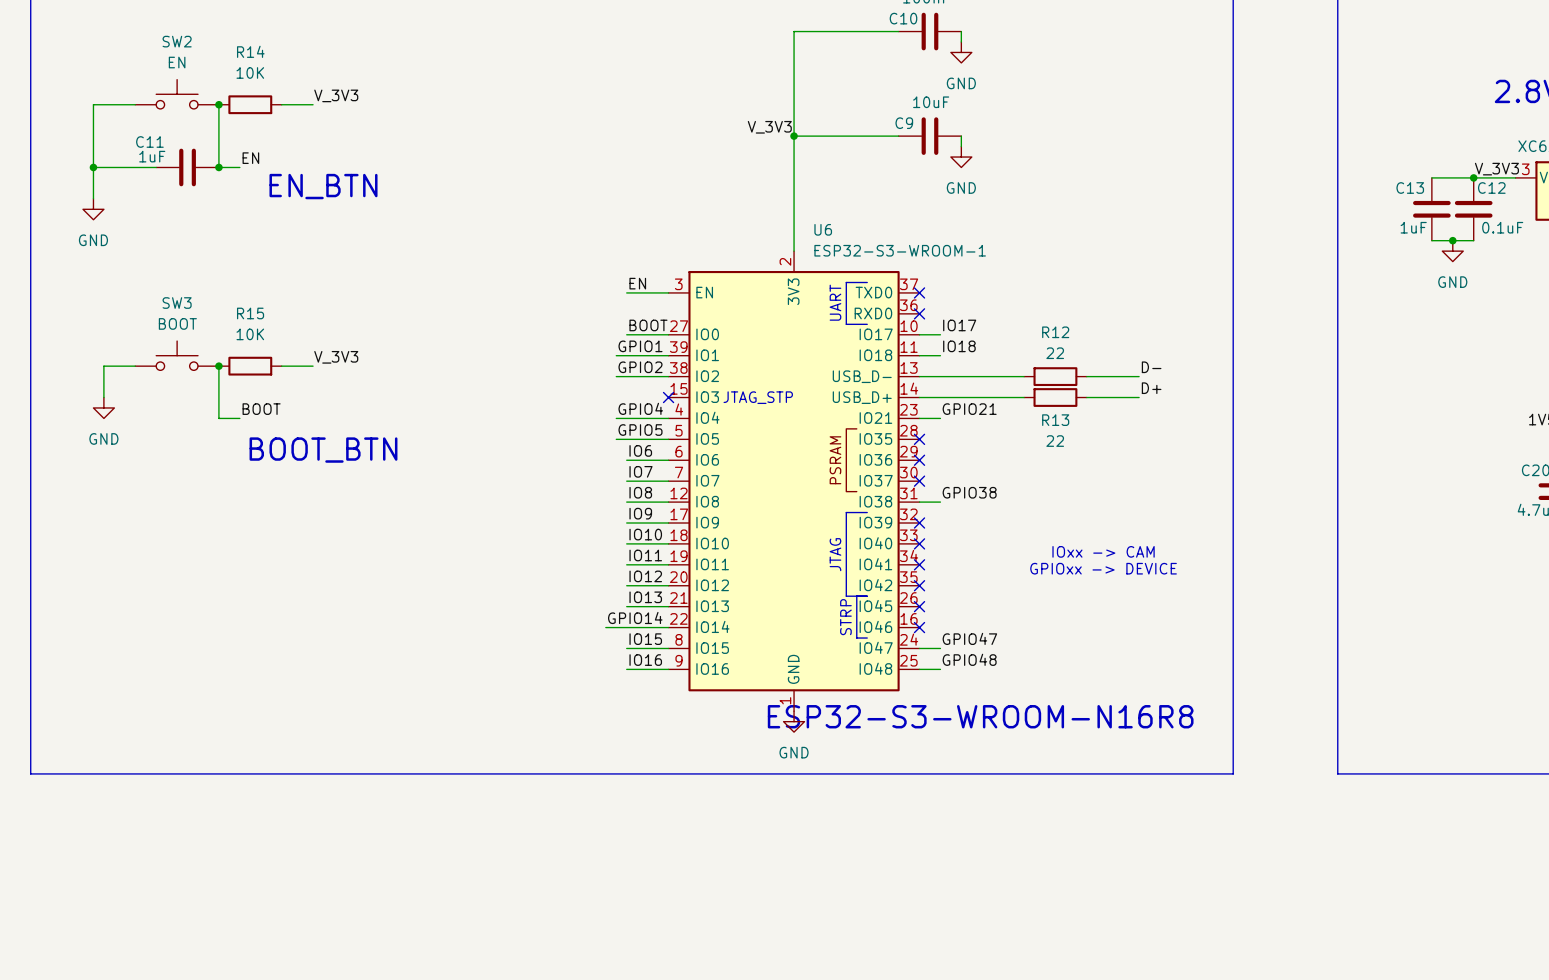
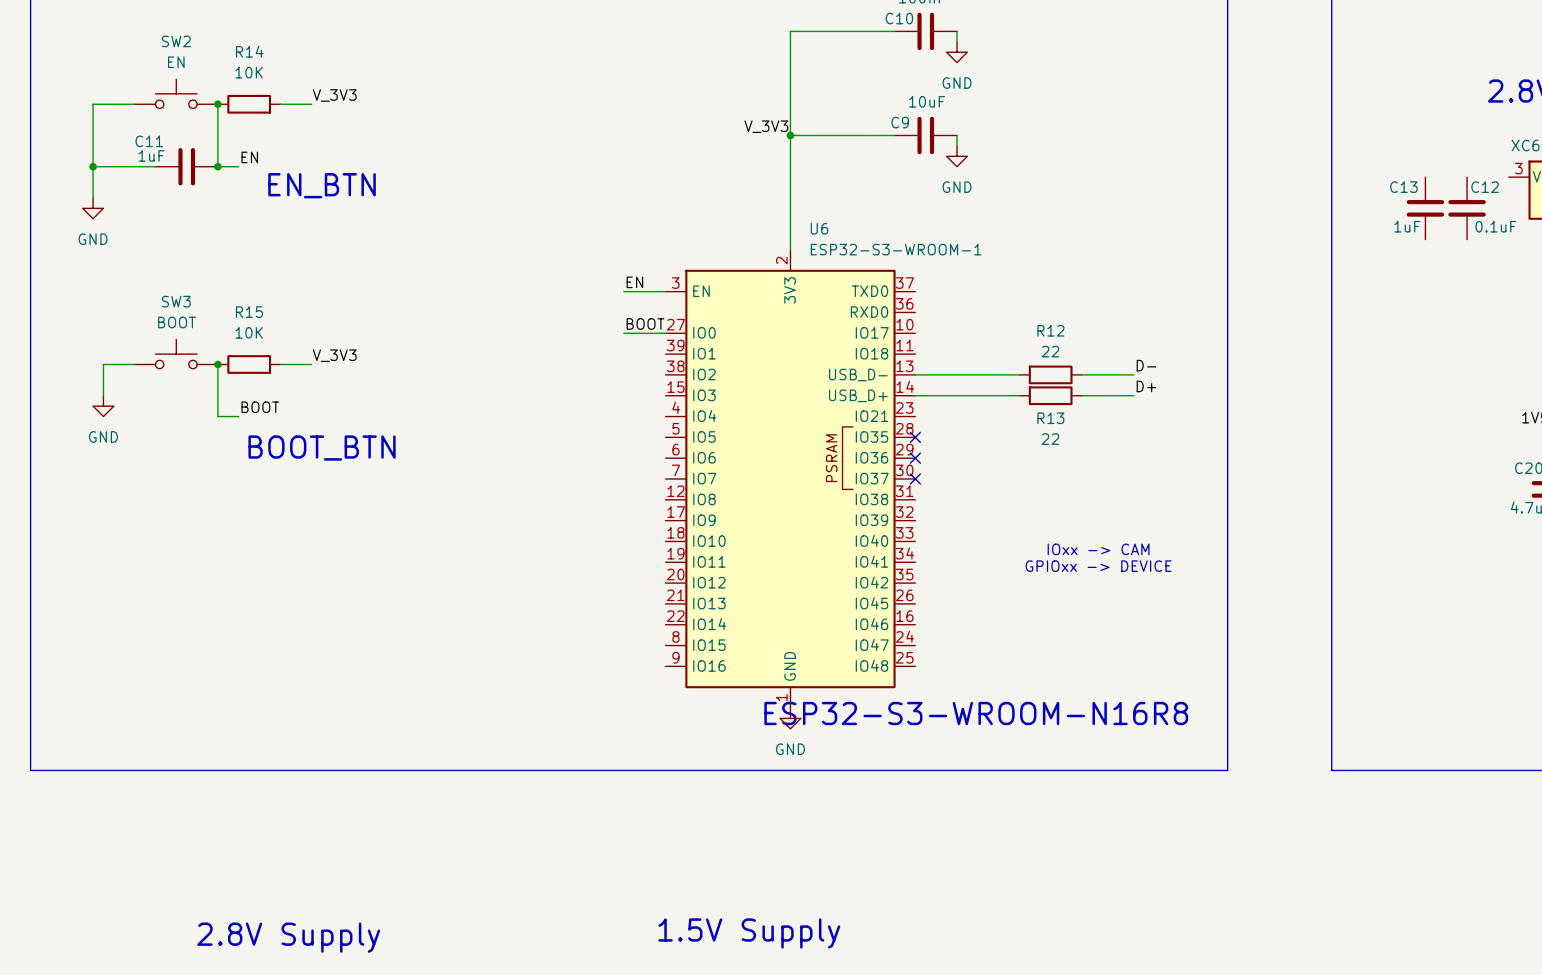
label: V_3V3 (1496, 169) -> none
wire: (1431, 177) (1515, 177) -> none
junction: (1473, 177) -> none
wire: (1431, 240) (1473, 240) -> none
junction: (1452, 240) -> none
power symbol: GND (1452, 251) -> none
line: (867, 282) (846, 282) (846, 324) (867, 324) -> none
no-connect mark: (919, 292) -> none
text: UART (835, 302) -> none
no-connect mark: (919, 313) -> none
label: IO17 (959, 325) -> none
wire: (919, 334) (940, 334) -> none
label: GPIO1 (640, 346) -> none
label: IO18 (959, 346) -> none
wire: (616, 355) (668, 355) -> none
wire: (919, 355) (940, 355) -> none
label: GPIO2 (640, 367) -> none
wire: (616, 376) (668, 376) -> none
no-connect mark: (668, 397) -> none
text: JTAG_STP (758, 397) -> none
label: GPIO4 (640, 408) -> none
label: GPIO21 (969, 409) -> none
wire: (616, 418) (668, 418) -> none
wire: (919, 418) (940, 418) -> none
label: GPIO5 (640, 430) -> none
wire: (616, 439) (668, 439) -> none
label: IO6 (640, 450) -> none
wire: (626, 460) (668, 460) -> none
label: IO7 (641, 471) -> none
wire: (626, 481) (668, 481) -> none
label: IO8 (640, 492) -> none
label: GPIO38 (969, 492) -> none
wire: (626, 502) (668, 502) -> none
wire: (919, 502) (940, 502) -> none
line: (867, 512) (846, 512) (846, 596) (867, 596) -> none
label: IO9 (640, 513) -> none
wire: (626, 523) (668, 523) -> none
no-connect mark: (919, 523) -> none
label: IO10 (645, 534) -> none
wire: (626, 543) (668, 543) -> none
no-connect mark: (919, 543) -> none
text: JTAG (835, 554) -> none
label: IO11 (645, 555) -> none
wire: (626, 564) (668, 564) -> none
no-connect mark: (919, 564) -> none
label: IO12 (645, 576) -> none
wire: (626, 585) (668, 585) -> none
no-connect mark: (919, 585) -> none
line: (856, 596) (856, 638) (867, 638) -> none
label: IO13 (645, 597) -> none
wire: (626, 606) (668, 606) -> none
no-connect mark: (919, 606) -> none
label: GPIO14 (635, 617) -> none
text: STRP (845, 617) -> none
wire: (605, 627) (668, 627) -> none
no-connect mark: (919, 627) -> none
label: GPIO47 (969, 638) -> none
label: IO15 (645, 639) -> none
wire: (626, 648) (668, 648) -> none
wire: (919, 648) (940, 648) -> none
label: GPIO48 (969, 659) -> none
label: IO16 (645, 660) -> none
wire: (626, 669) (668, 669) -> none
wire: (919, 669) (940, 669) -> none
text: none -> 1.5V Supply (749, 933)
text: none -> 2.8V Supply (288, 937)

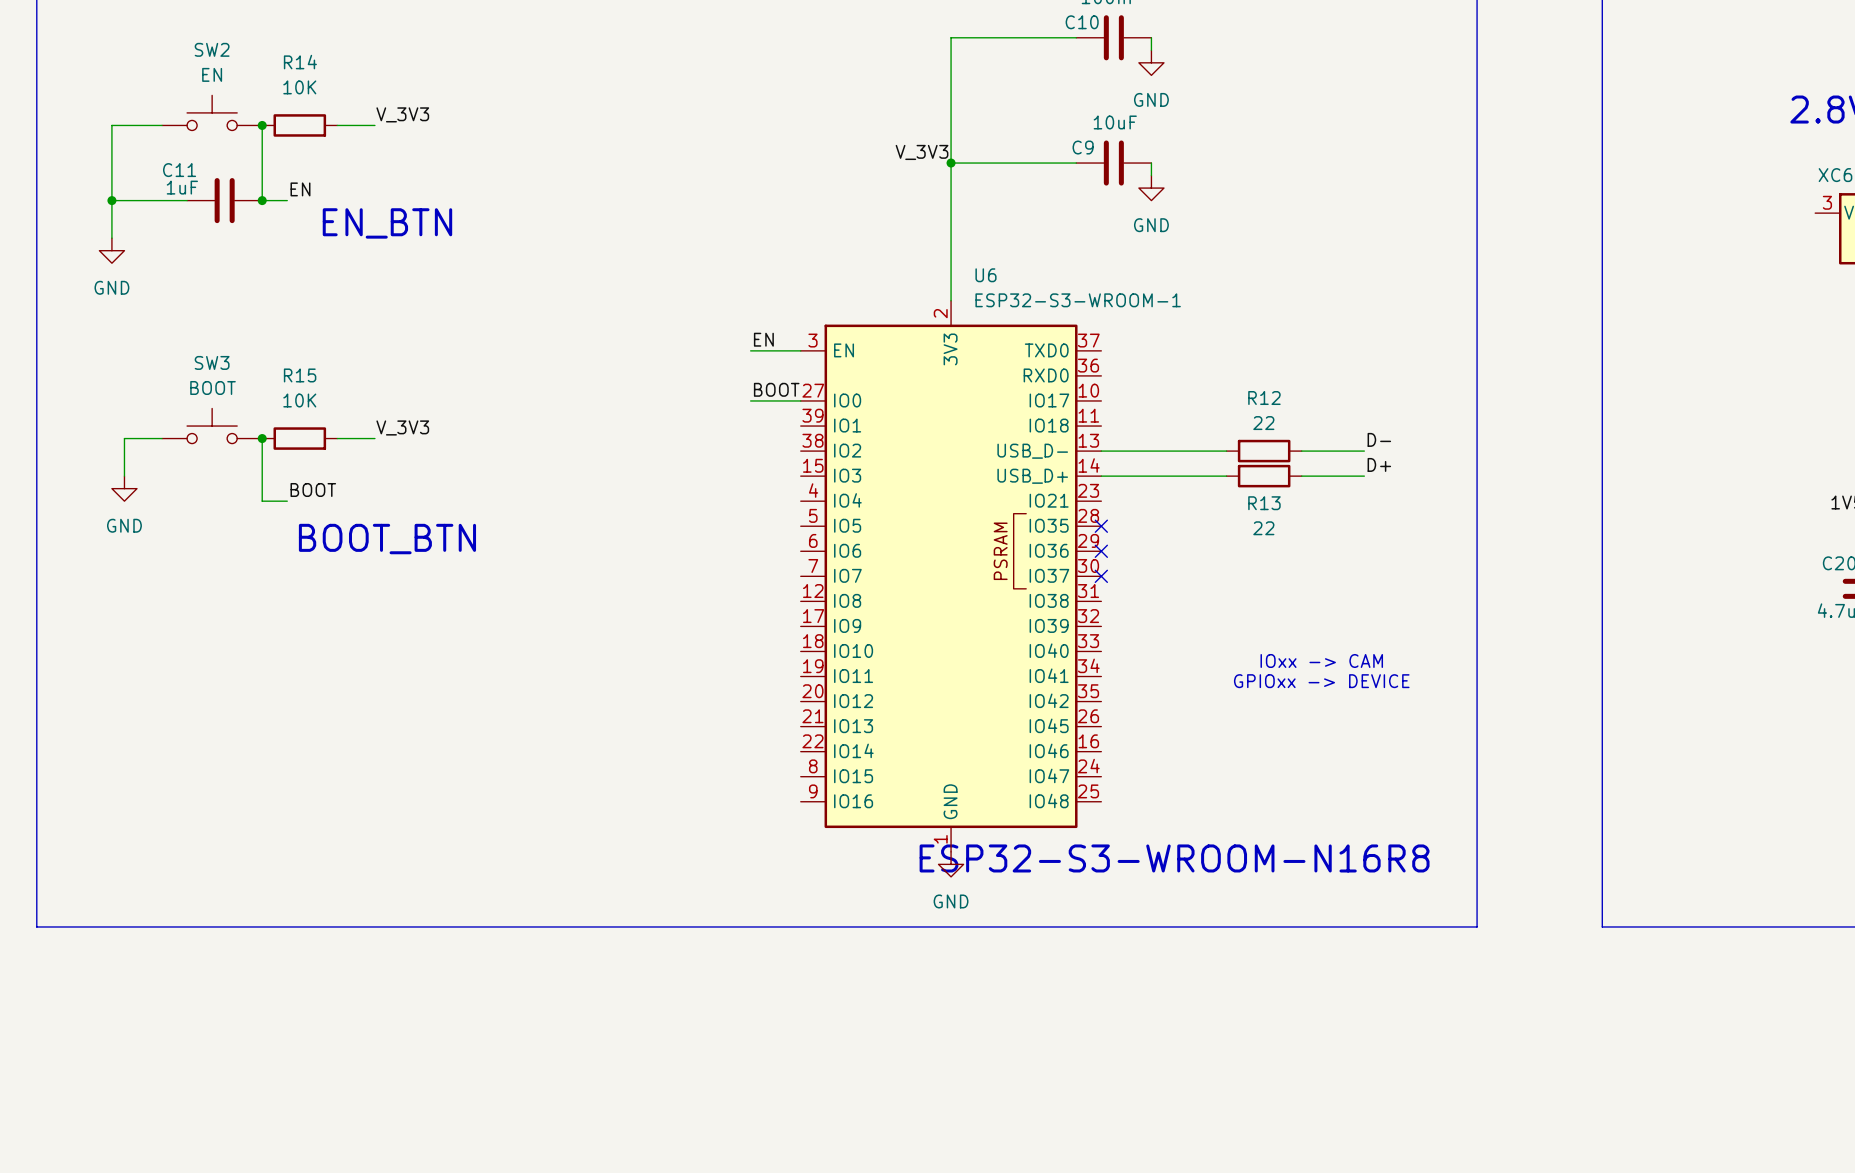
C13: 1uF (1425, 208) -> none
C12: 0.1uF (1467, 208) -> none
text: 1.5V Supply (749, 933) -> none
text: 2.8V Supply (288, 937) -> none

